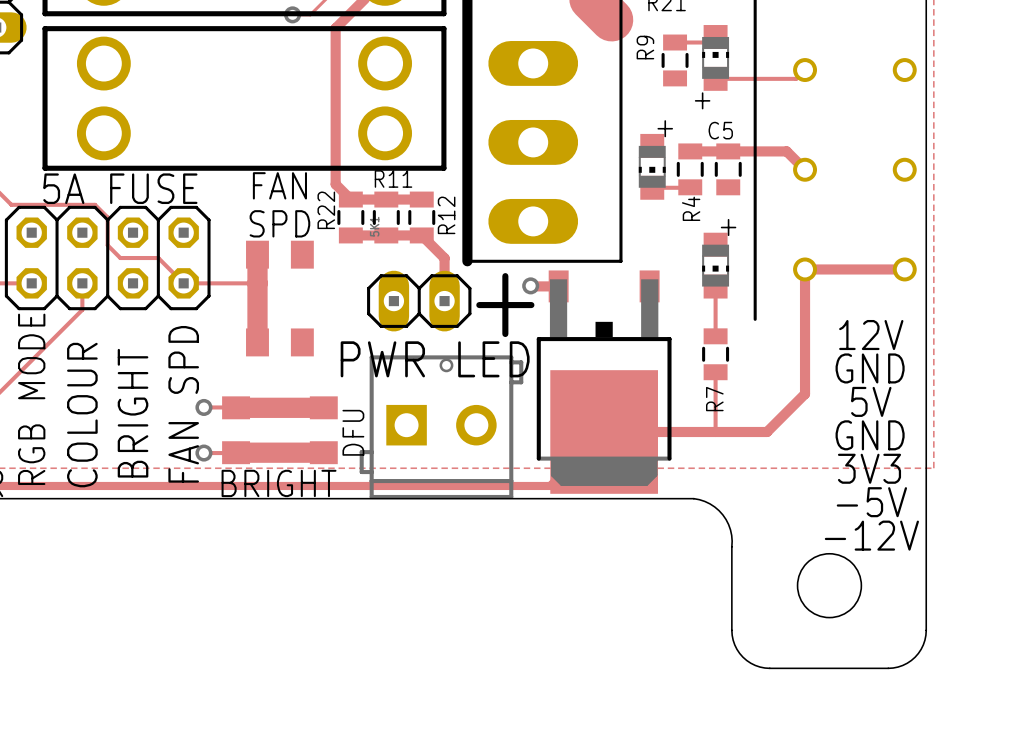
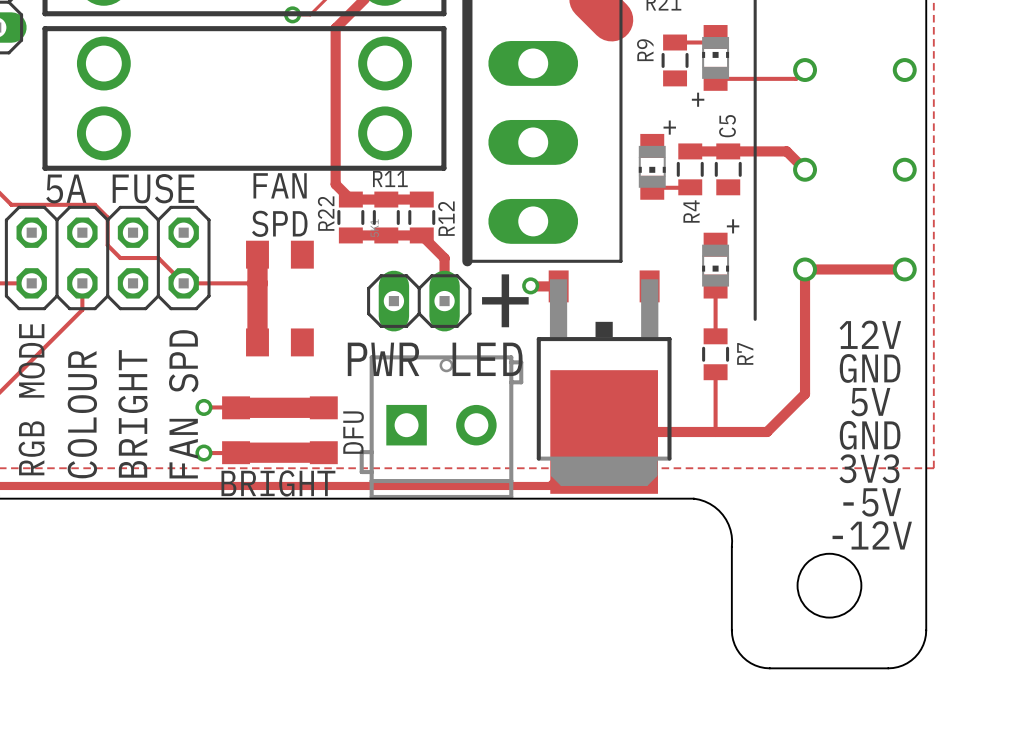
C5 name rotation: 0° (720, 130) -> 90° counterclockwise (727, 126)
R7 name position: R7 (714, 399) -> R7 (745, 353)

